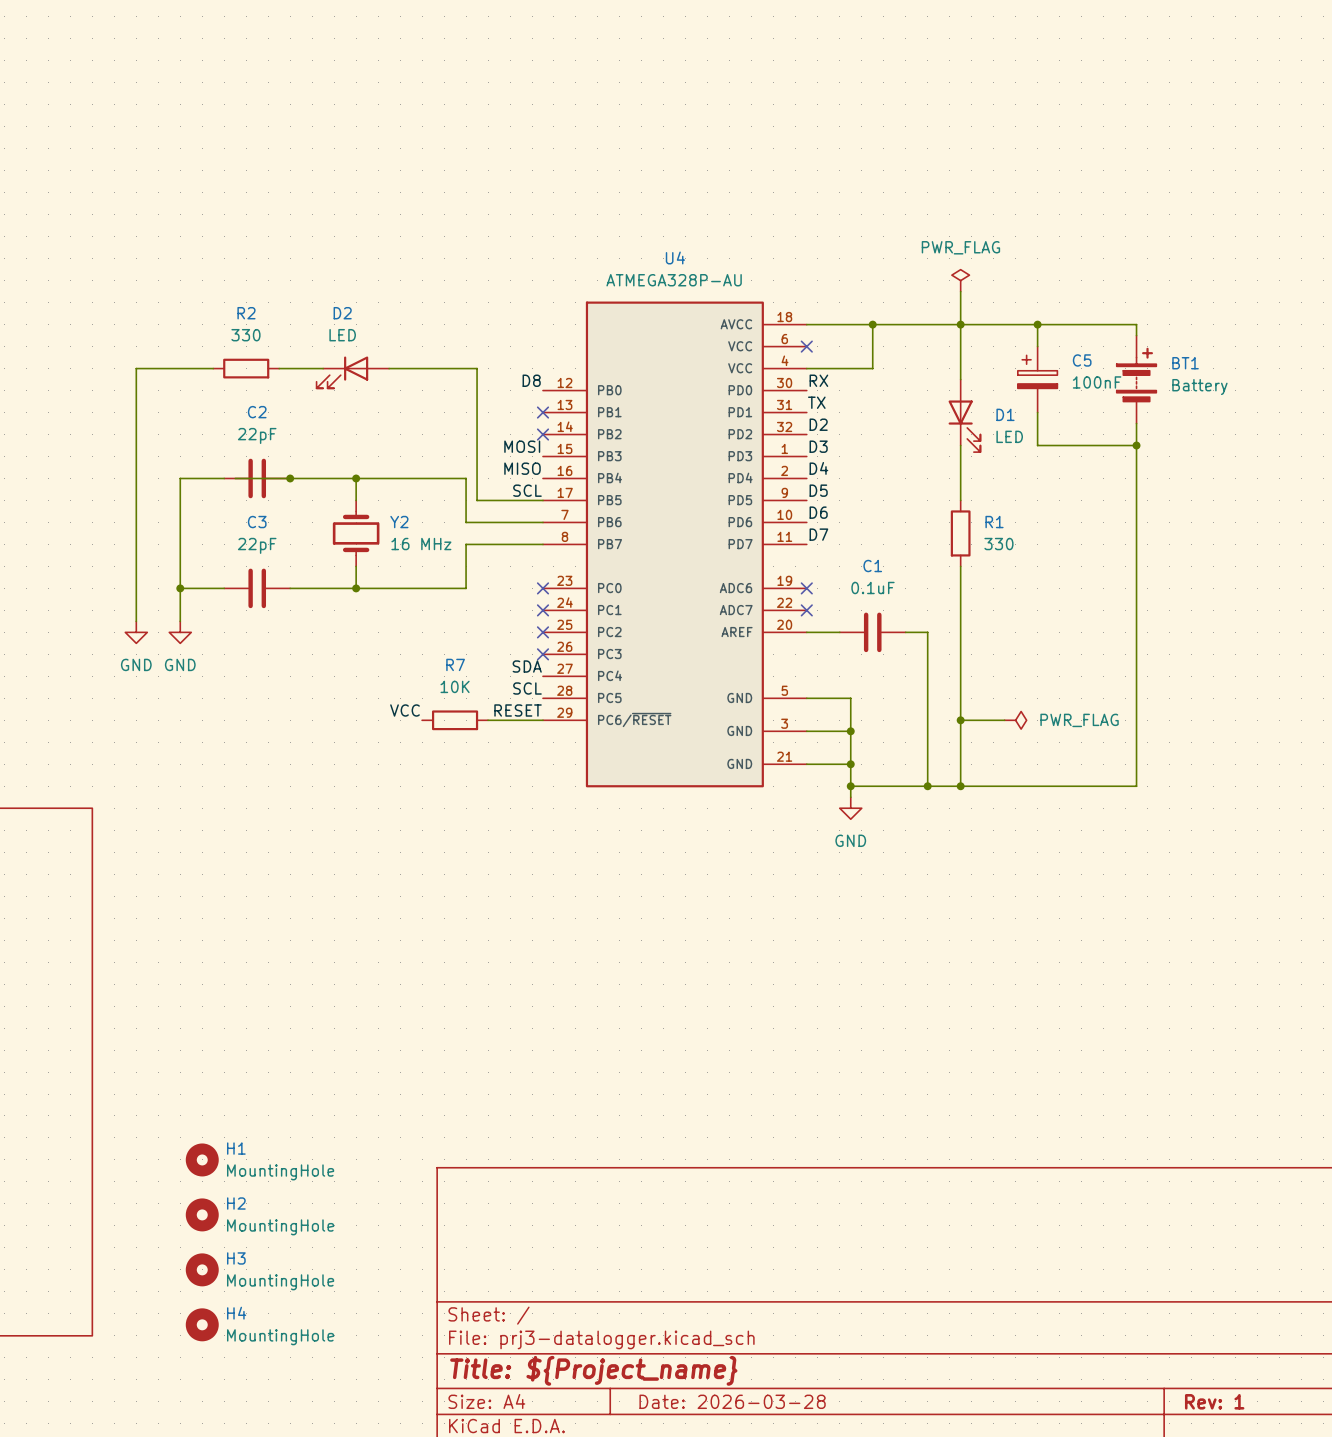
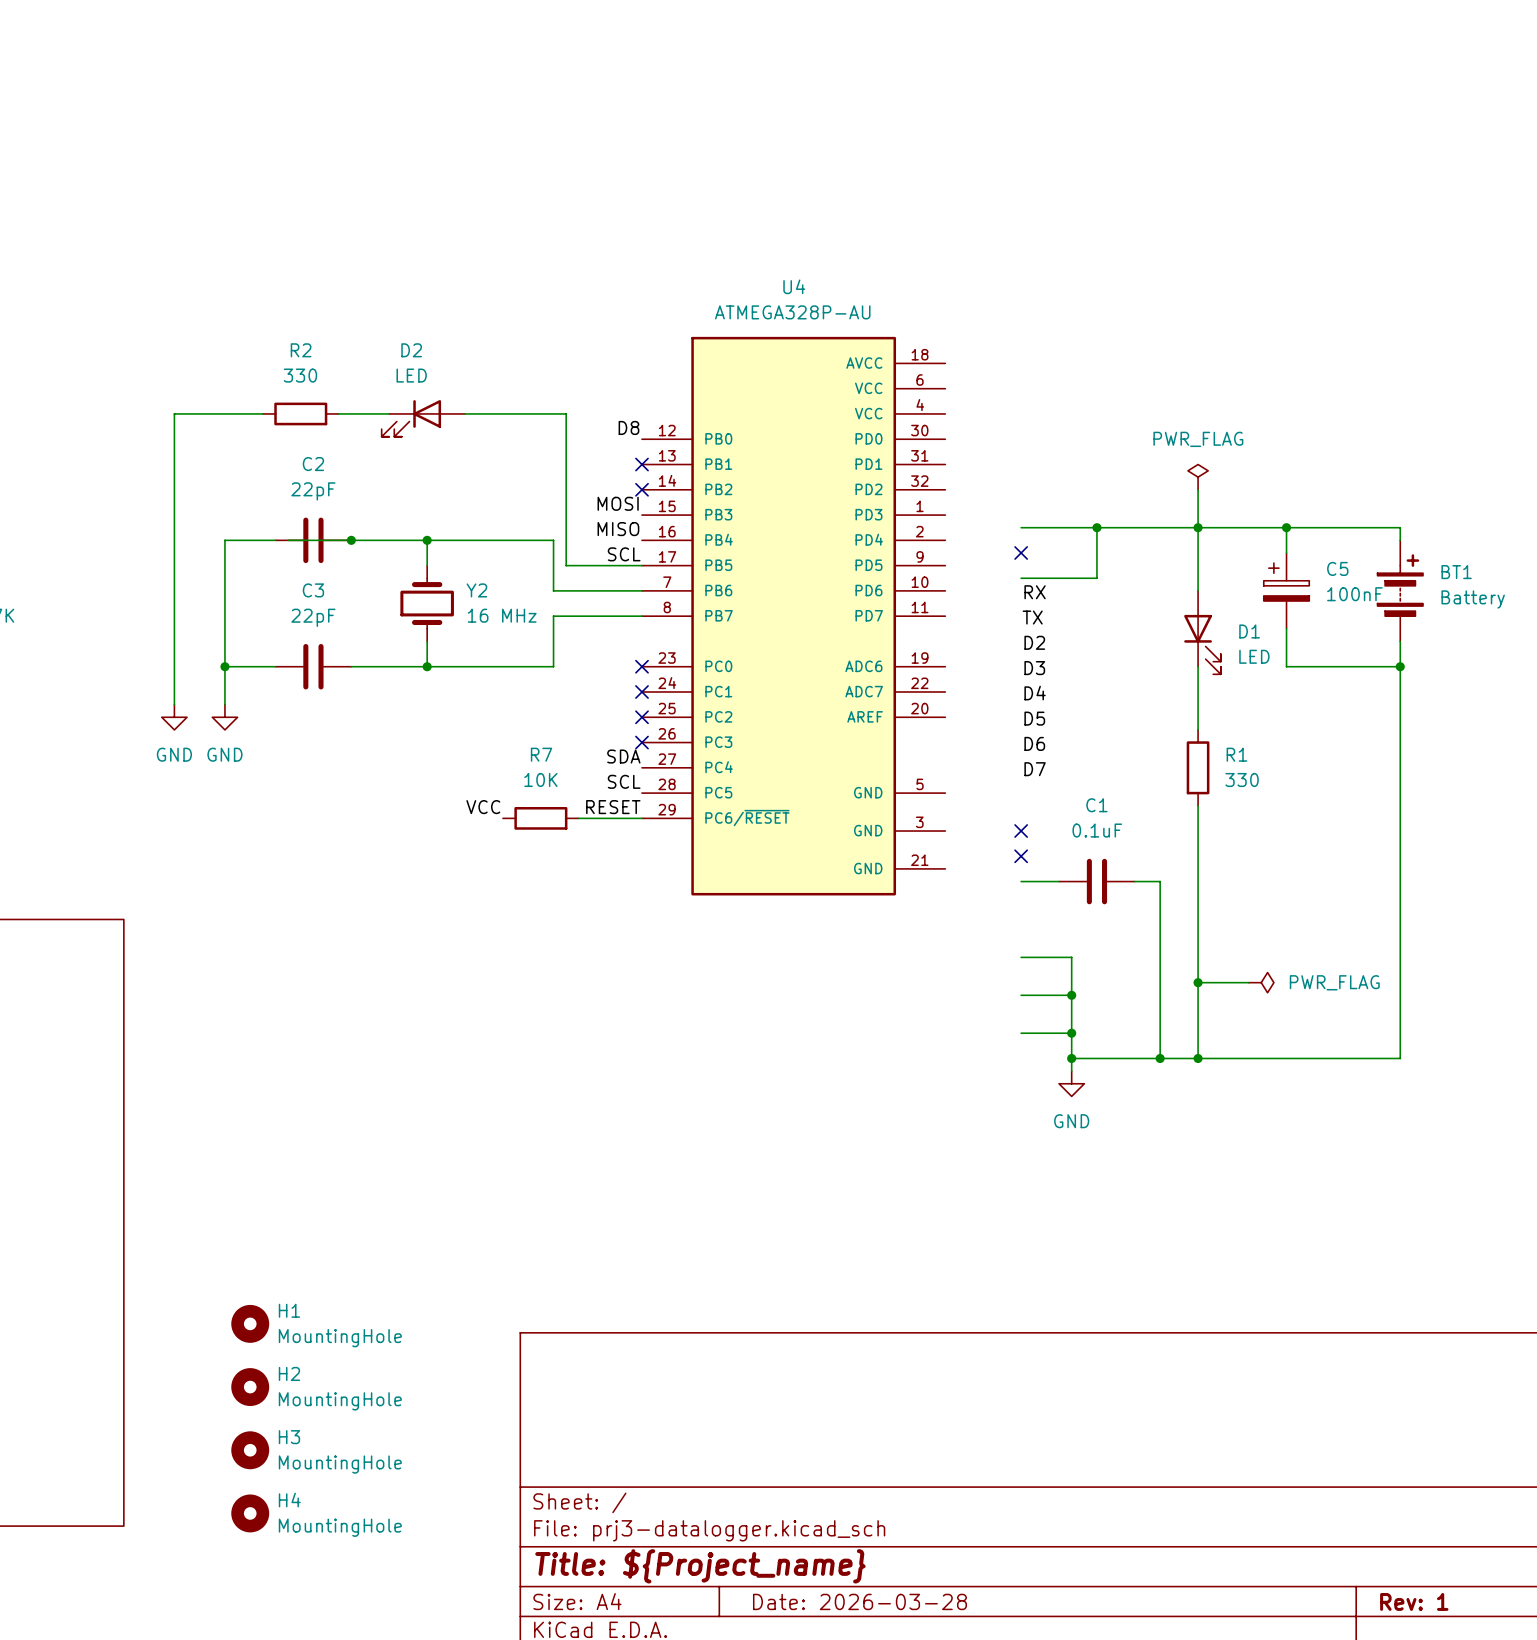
power symbol: PWR_FLAG (960, 280) -> none
wire: (960, 291) (960, 379) -> (1198, 489) (1198, 590)
wire: (806, 324) (1136, 324) (1136, 335) -> (1021, 527) (1400, 527) (1400, 540)
wire: (872, 324) (872, 368) (806, 368) -> (1096, 527) (1096, 578) (1021, 578)
junction: (872, 324) -> none
junction: (960, 324) -> none
wire: (1037, 324) (1037, 346) -> (1286, 527) (1286, 552)
junction: (1037, 324) -> none
no-connect mark: (806, 346) -> none
C5 position: (1037, 379) -> (1286, 590)
BT1 position: (1136, 379) -> (1400, 590)
label position: RX (818, 380) -> RX (1035, 592)
label position: TX (816, 402) -> TX (1032, 617)
wire: (1037, 412) (1037, 445) (1136, 445) -> (1286, 628) (1286, 666) (1400, 666)
D1 position: (964, 415) -> (1202, 632)
power symbol: none -> PWR_FLAG (1198, 477)
wire: (1136, 423) (1136, 786) (850, 786) -> (1400, 641) (1400, 1058) (1071, 1058)
label position: D2 (818, 424) -> D2 (1034, 642)
wire: (960, 445) (960, 500) -> (1198, 666) (1198, 729)
junction position: (1136, 445) -> (1286, 527)
label position: D3 (818, 446) -> D3 (1034, 668)
junction: none -> (1096, 527)
junction: none -> (1198, 527)
label position: D4 (818, 468) -> D4 (1035, 693)
no-connect mark: none -> (1021, 552)
label position: D5 (818, 490) -> D5 (1034, 718)
label position: D6 (818, 512) -> D6 (1034, 743)
R1 position: (960, 533) -> (1198, 767)
label position: D7 (818, 534) -> D7 (1035, 769)
wire: (960, 566) (960, 786) -> (1198, 805) (1198, 1058)
no-connect mark: (806, 588) -> none
junction: none -> (1400, 666)
no-connect mark: (806, 610) -> none
wire: (806, 632) (839, 632) -> (1021, 881) (1059, 881)
C1 position: (872, 632) -> (1096, 881)
wire: (905, 632) (927, 632) (927, 786) -> (1134, 881) (1160, 881) (1160, 1058)
wire: (806, 698) (850, 698) (850, 797) -> (1021, 957) (1071, 957) (1071, 1071)
wire: (960, 720) (1004, 720) -> (1198, 982) (1248, 982)
junction: (960, 720) -> none
power symbol: PWR_FLAG (1015, 720) -> none
wire: (806, 731) (850, 731) -> (1021, 995) (1071, 995)
junction: (850, 731) -> none
no-connect mark: none -> (1021, 831)
no-connect mark: none -> (1021, 856)
wire: (806, 764) (850, 764) -> (1021, 1033) (1071, 1033)
junction: (850, 764) -> none
junction: (850, 786) -> none
junction: (927, 786) -> none
junction: (960, 786) -> none
power symbol position: GND (850, 808) -> GND (1071, 1083)
junction: none -> (1198, 982)
power symbol: none -> PWR_FLAG (1261, 982)
junction: none -> (1071, 995)
junction: none -> (1071, 1033)
junction: none -> (1071, 1058)
junction: none -> (1160, 1058)
junction: none -> (1198, 1058)

